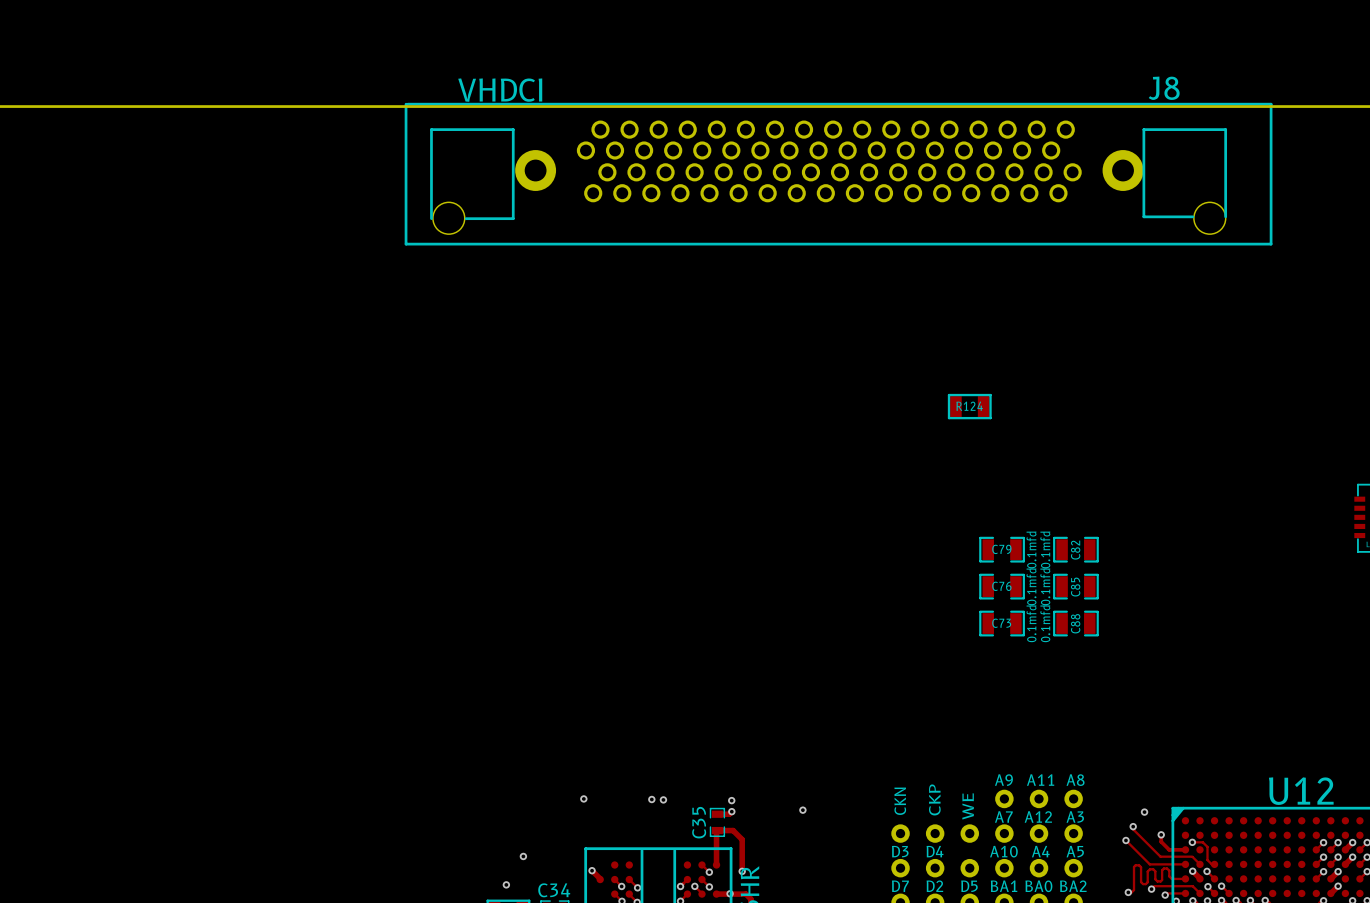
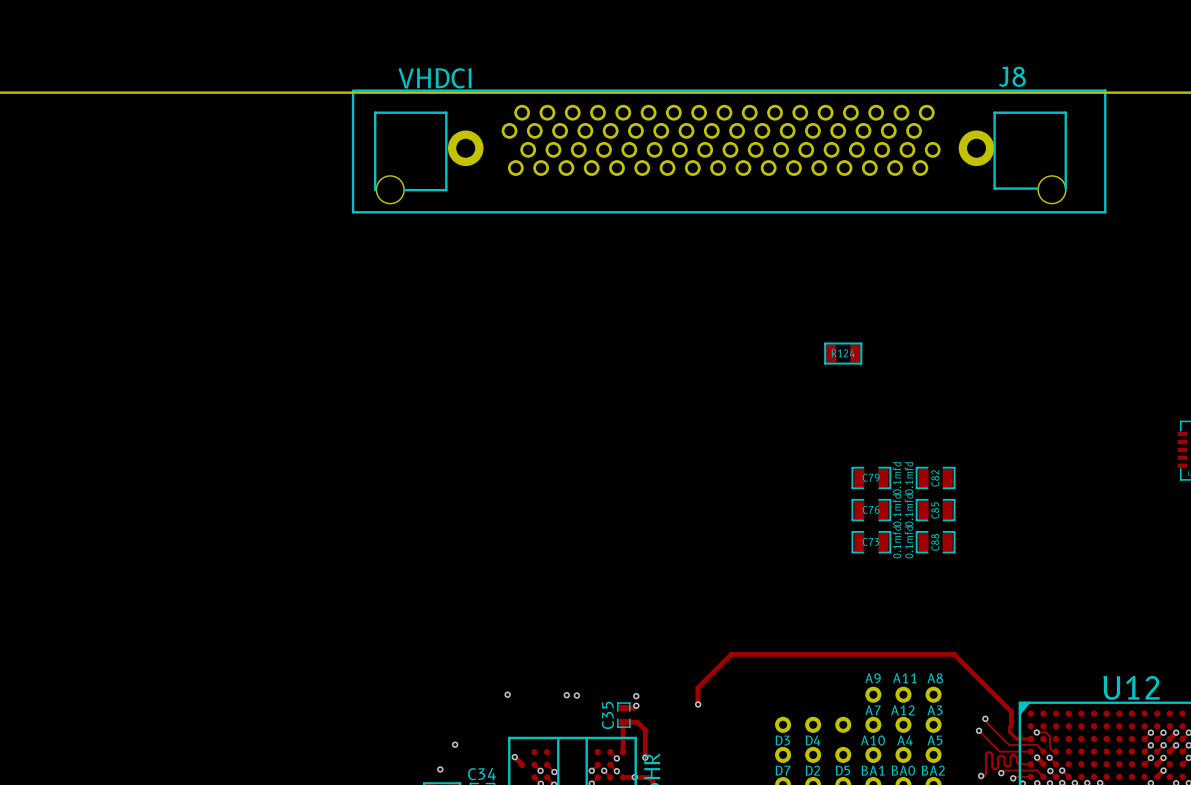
text: CKP (934, 799) -> none
text: CKN (900, 801) -> none
text: WE (968, 806) -> none
track: none -> (697, 704) (697, 687) (731, 654) (954, 654) (1011, 711) (1011, 725)
via: (1144, 812) -> none
via: (1161, 834) -> none

